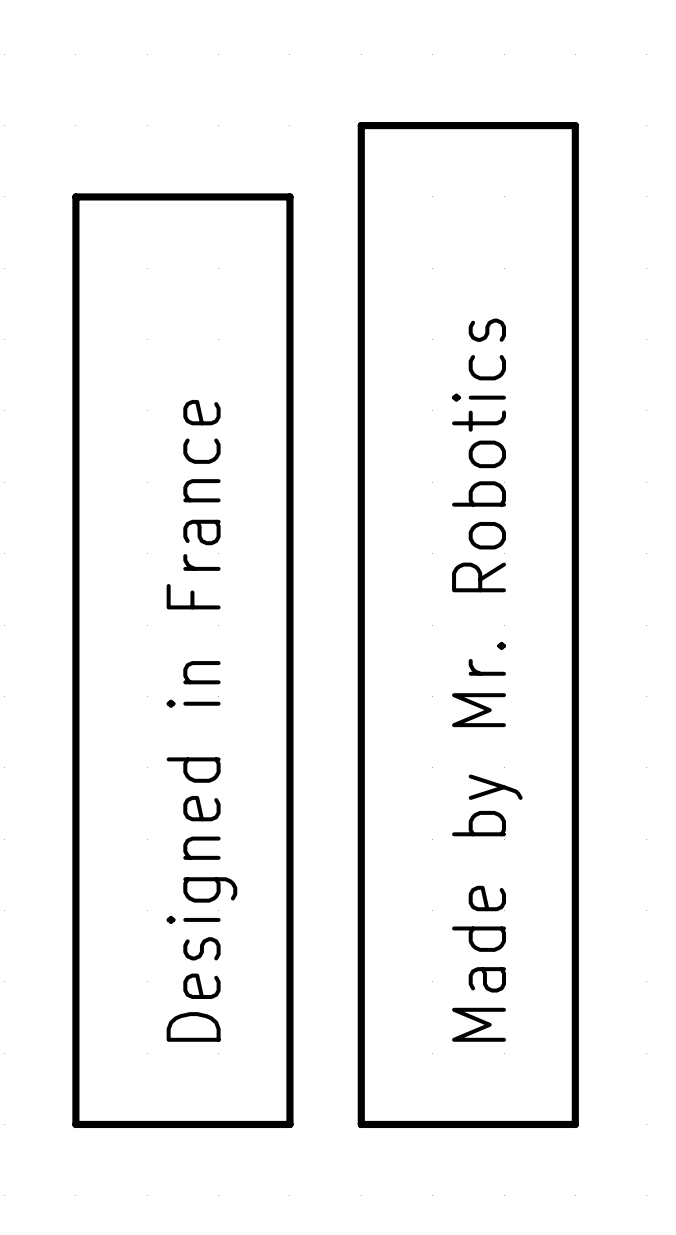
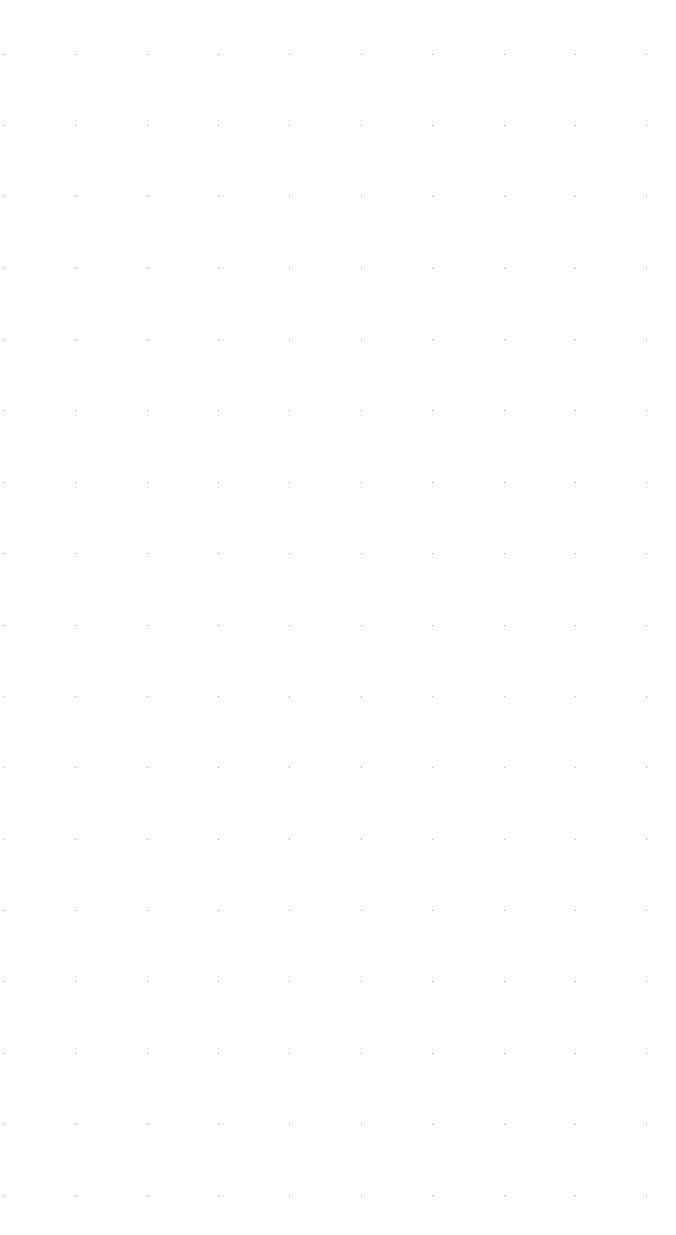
part: (468, 625) -> none
part: (182, 660) -> none

